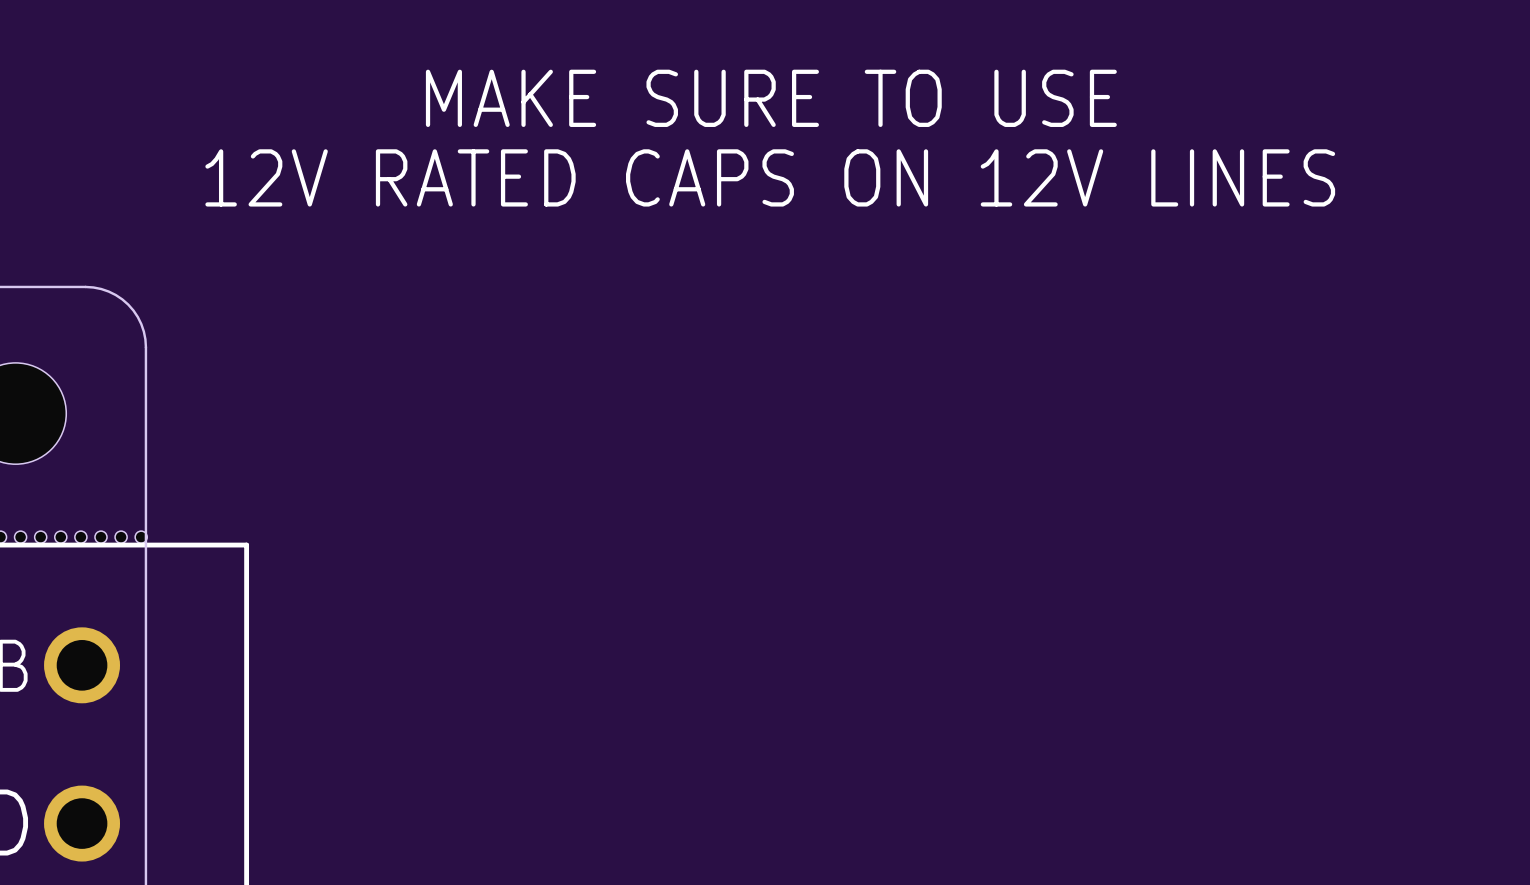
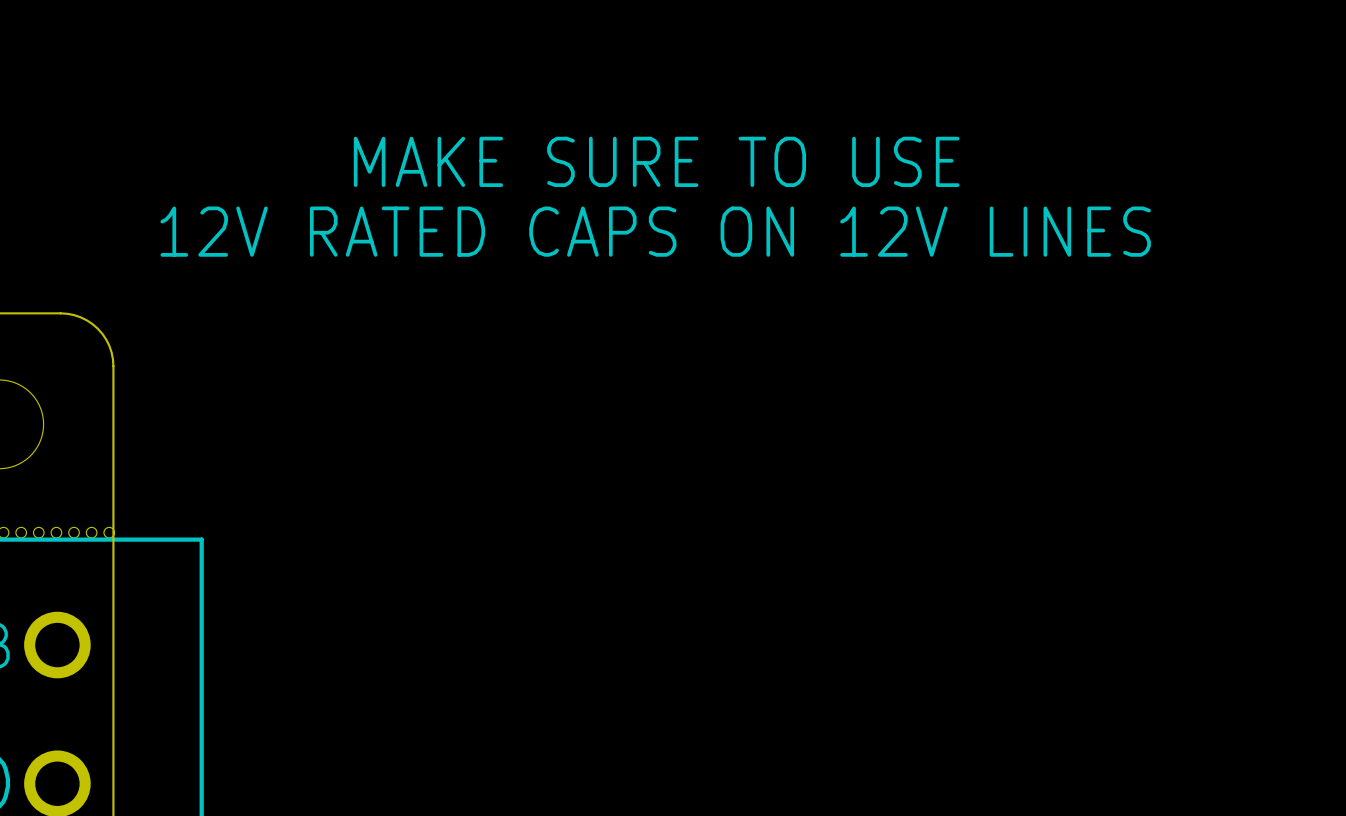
text position: MAKE SURE TO USE (771, 98) -> MAKE SURE TO USE (656, 161)
text position: 12V RATED CAPS ON 12V LINES (770, 177) -> 12V RATED CAPS ON 12V LINES (655, 231)

